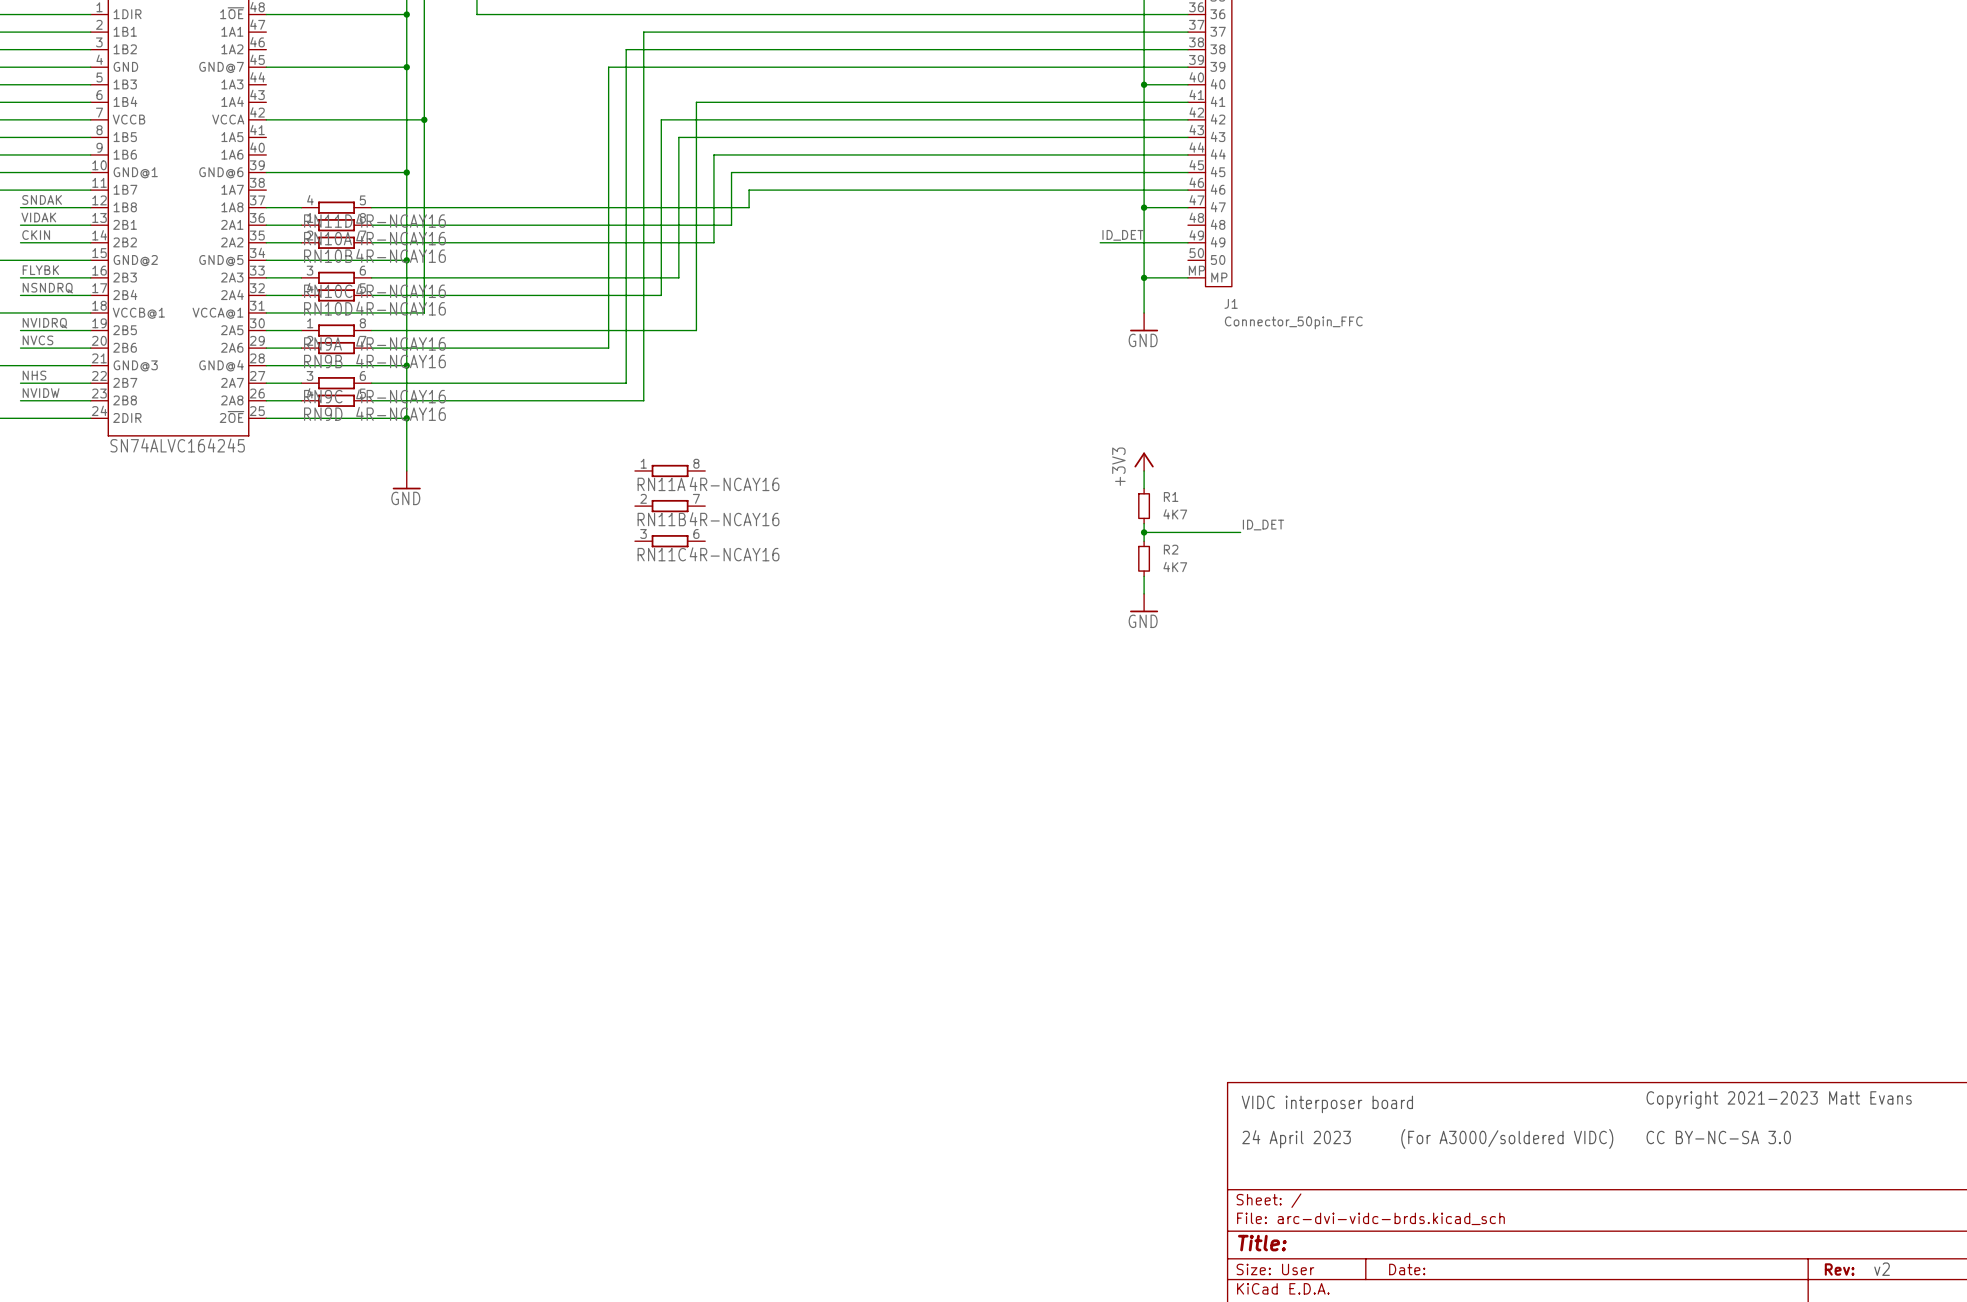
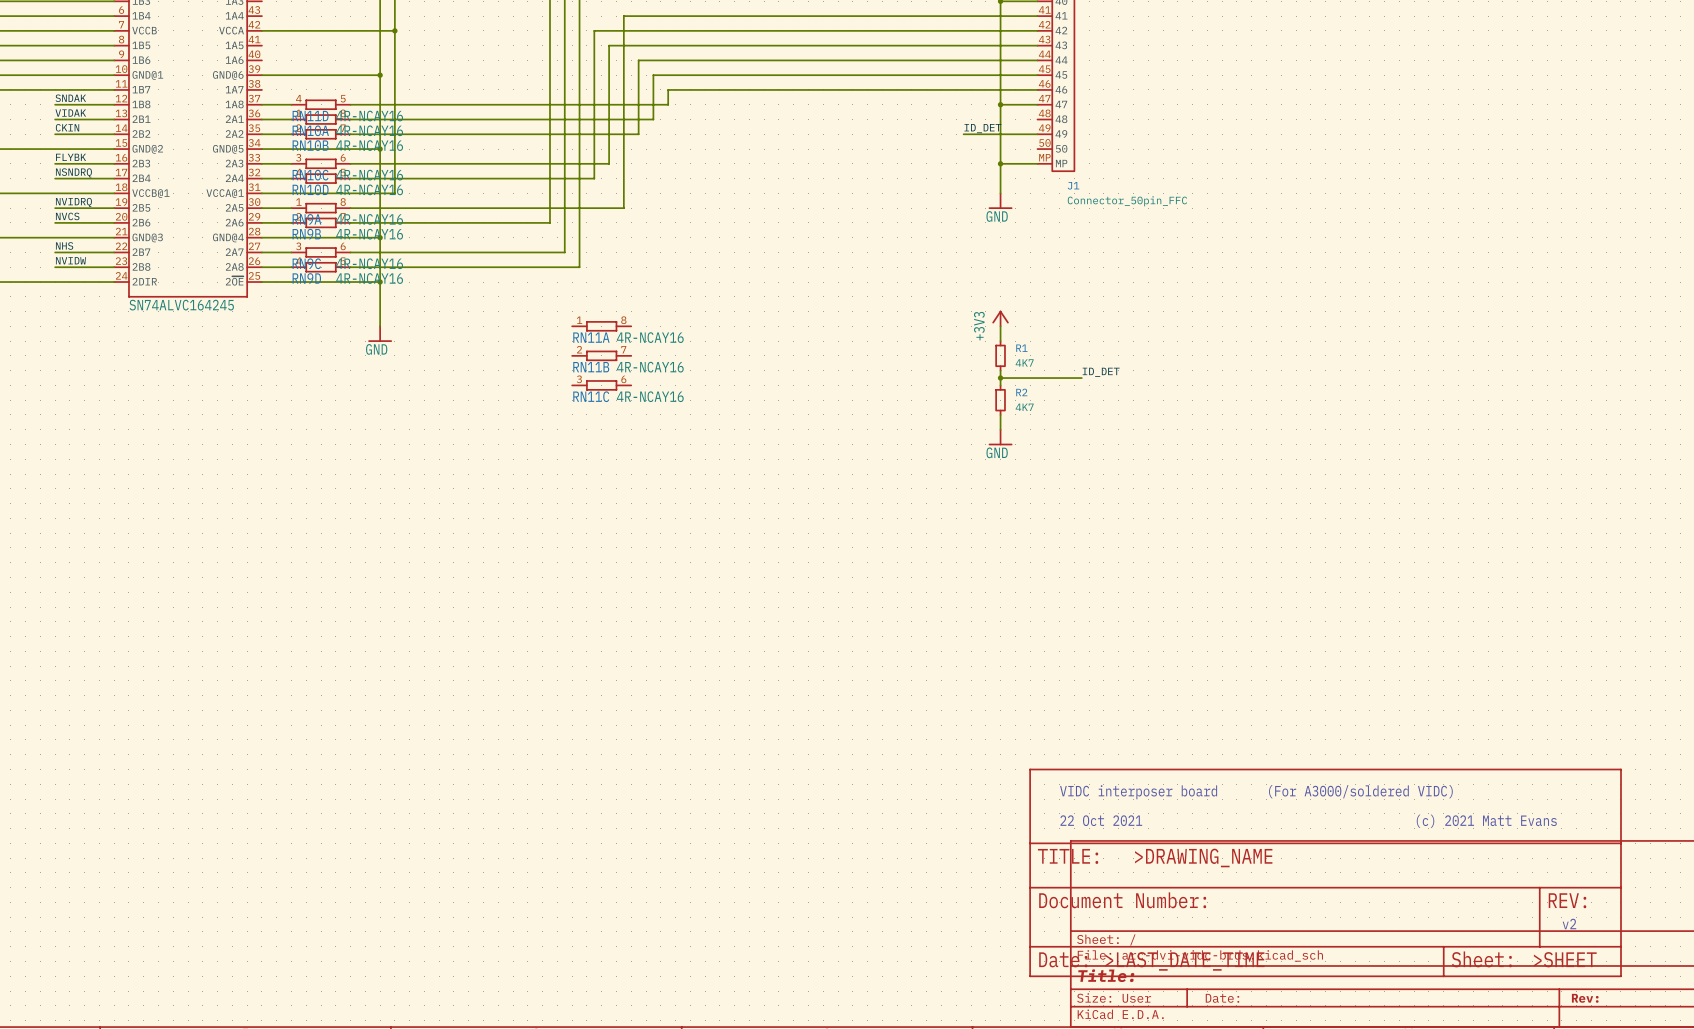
text: none -> 22 Oct 2021 (1101, 820)
text: none -> (c) 2021 Matt Evans (1486, 821)
text: Copyright 2021-2023 Matt Evans (1779, 1099) -> none
text position: VIDC interposer board (1327, 1104) -> VIDC interposer board (1138, 792)
power symbol: none -> (1325, 872)
text: CC BY-NC-SA 3.0 (1718, 1137) -> none
text position: (For A3000/soldered VIDC) (1507, 1138) -> (For A3000/soldered VIDC) (1360, 791)
text: 24 April 2023 (1296, 1139) -> none
text position: v2 (1882, 1269) -> v2 (1569, 924)

